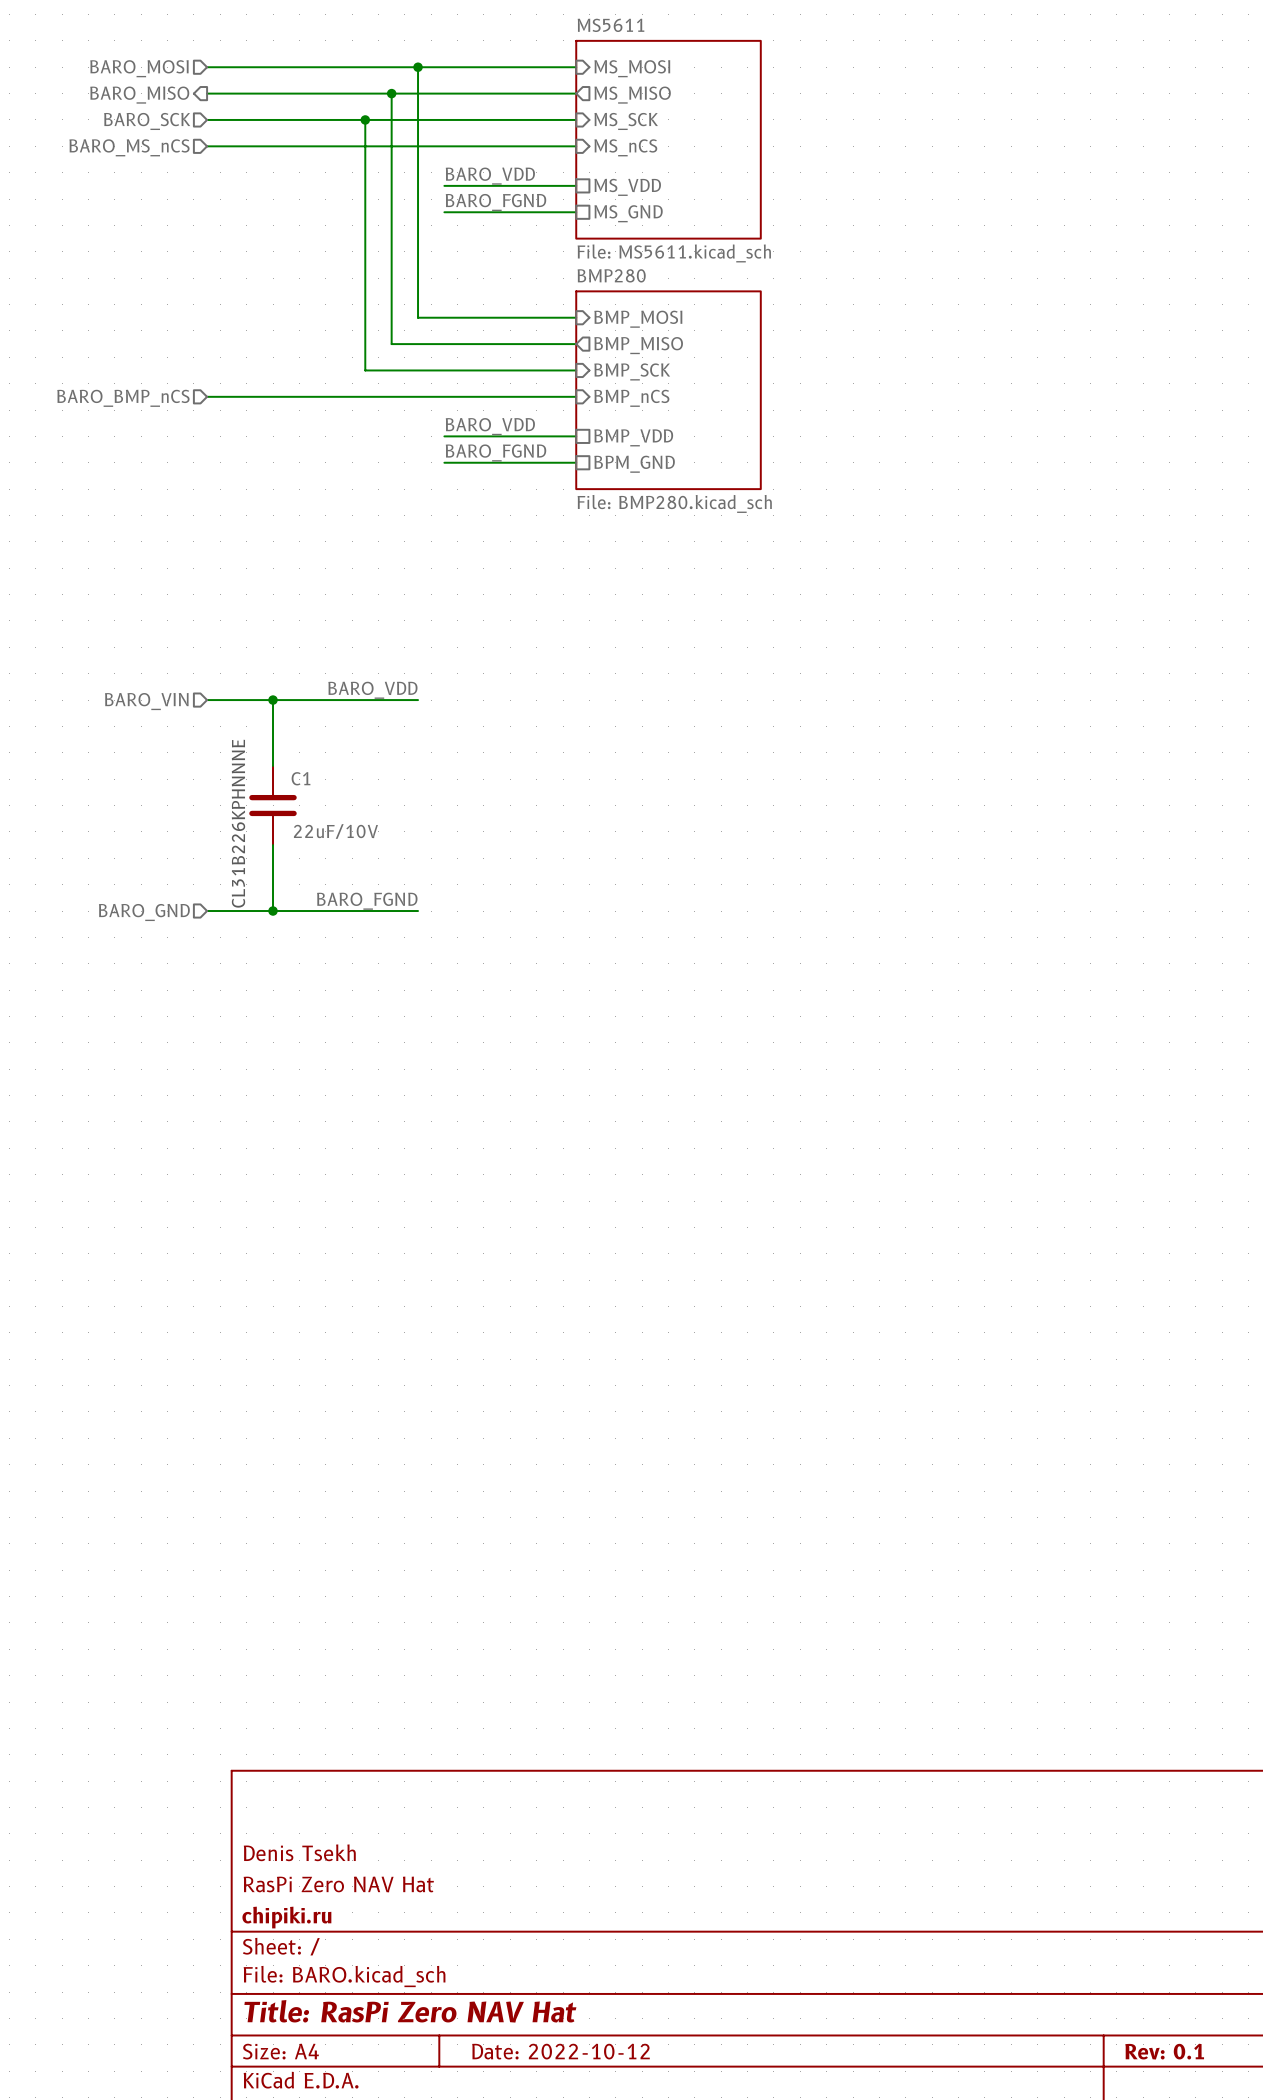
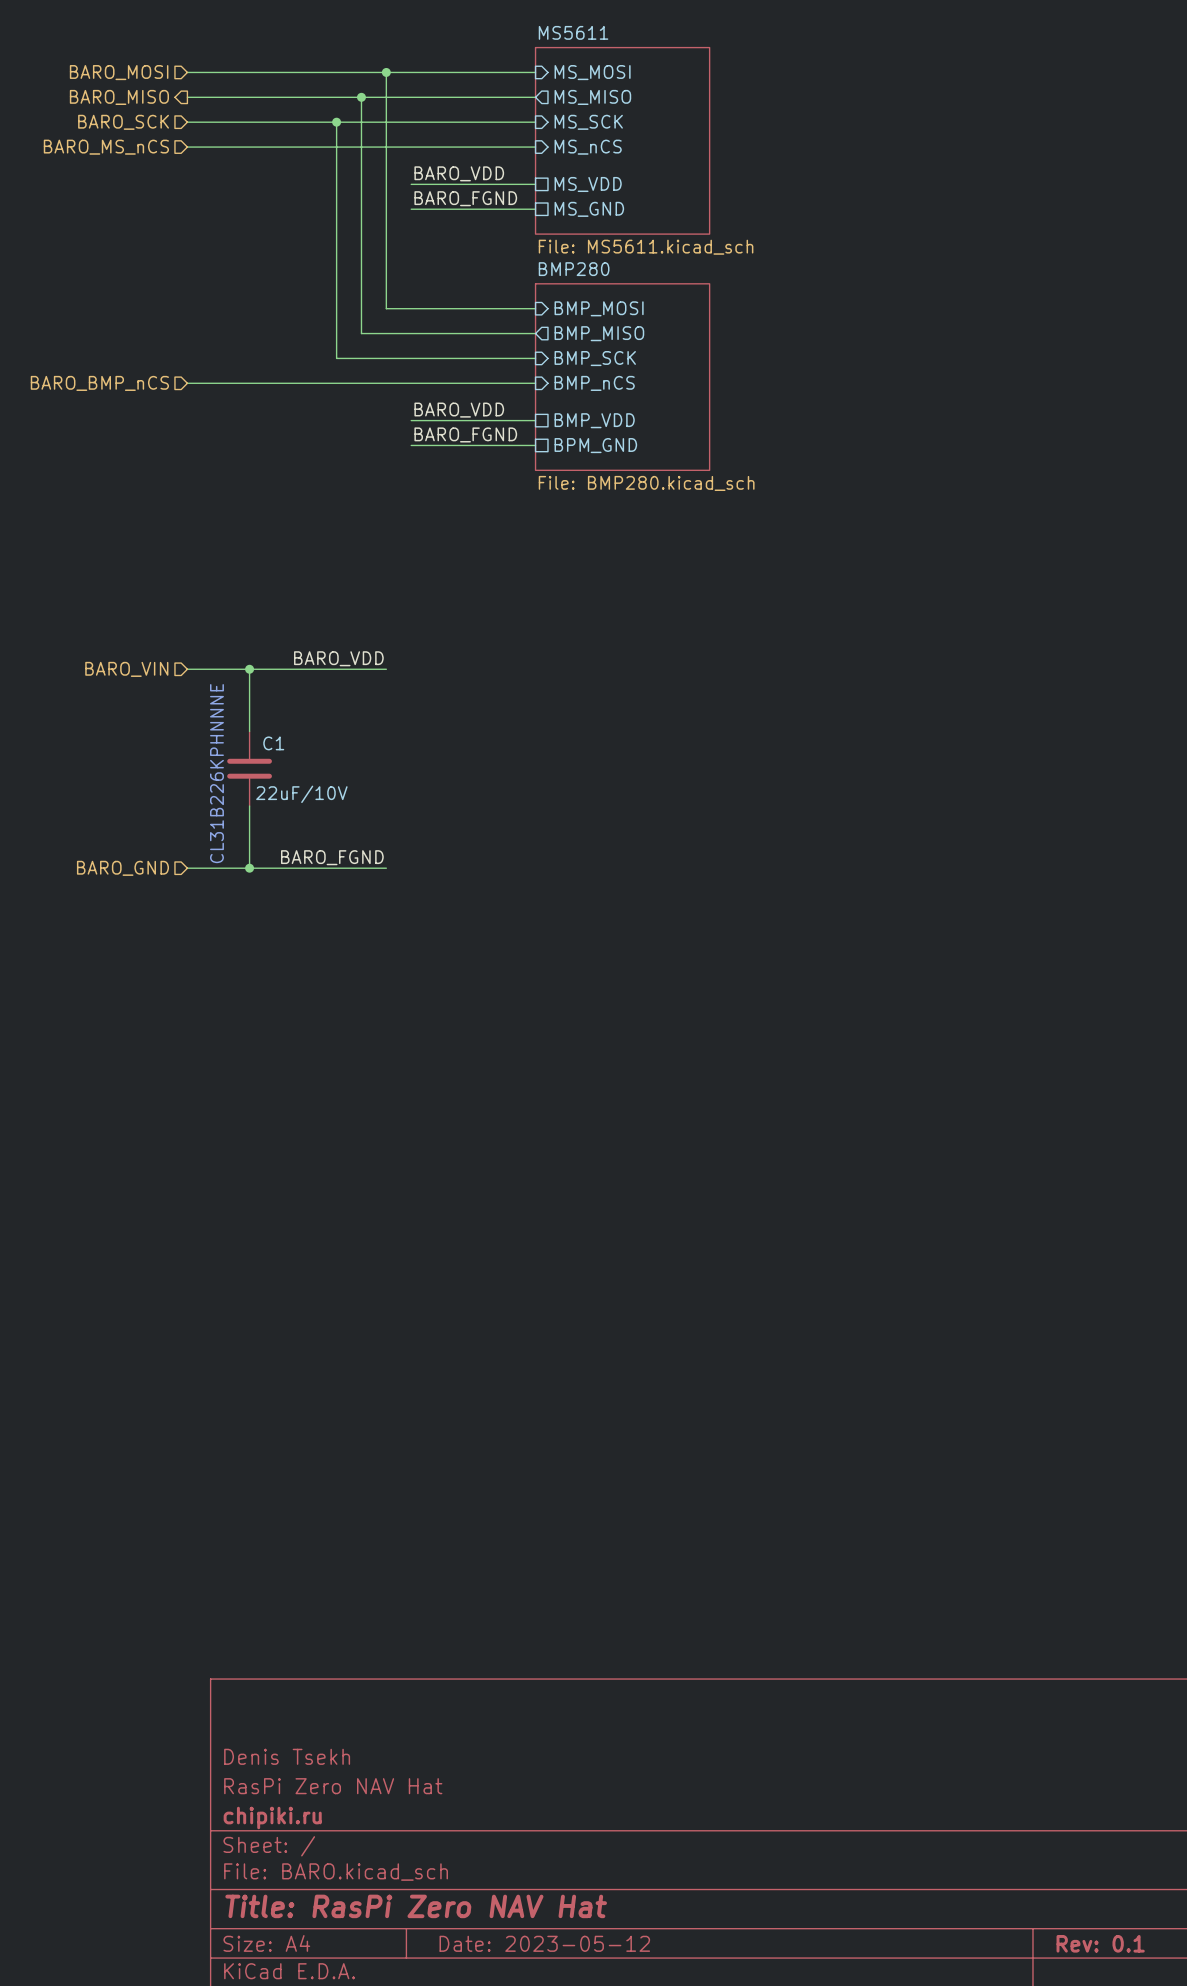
title block: Date: 2022-10-12 (560, 2051) -> Date: 2023-05-12 (544, 1943)

